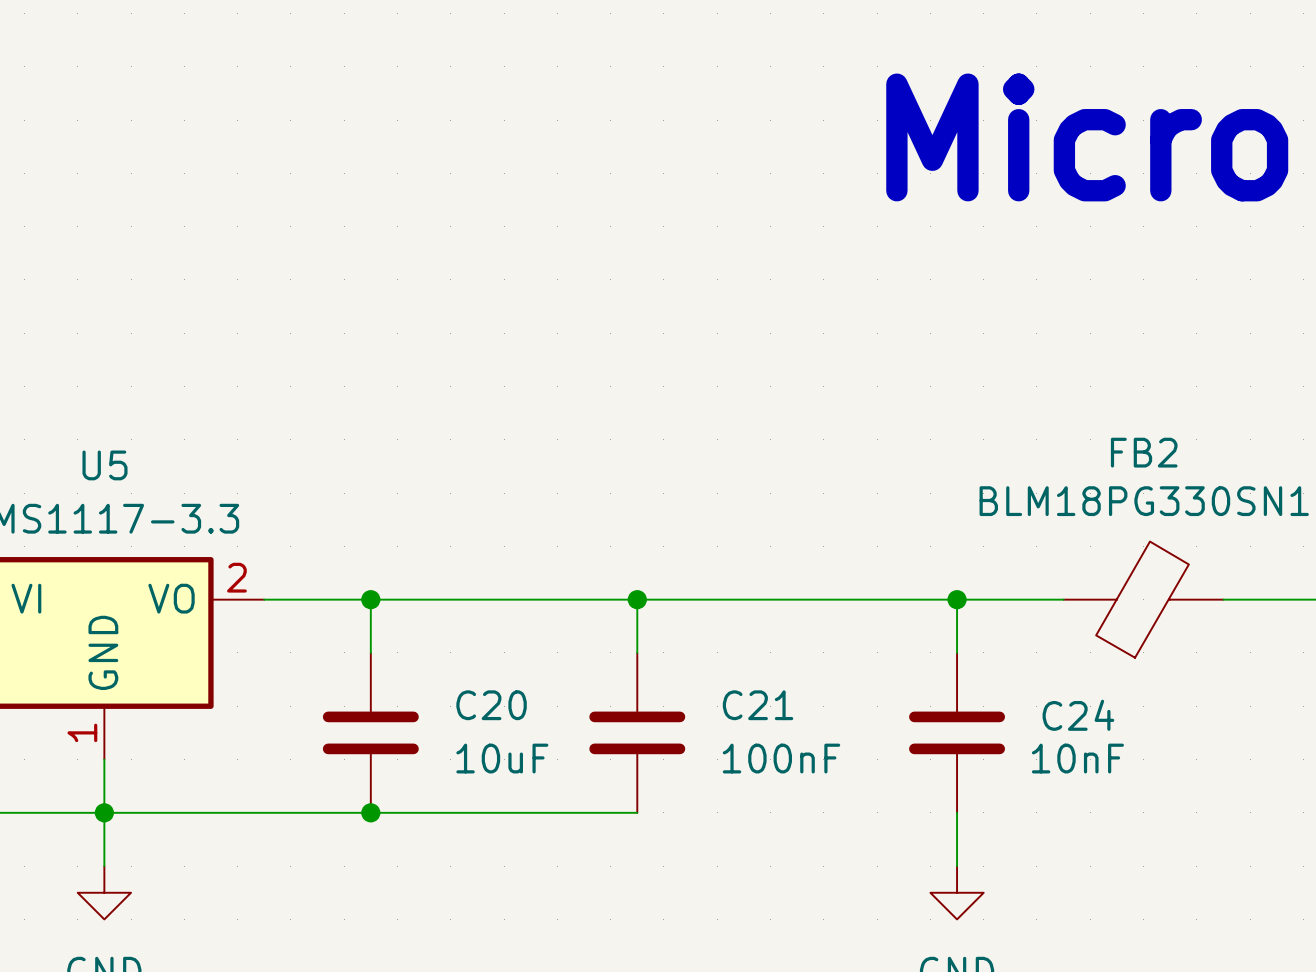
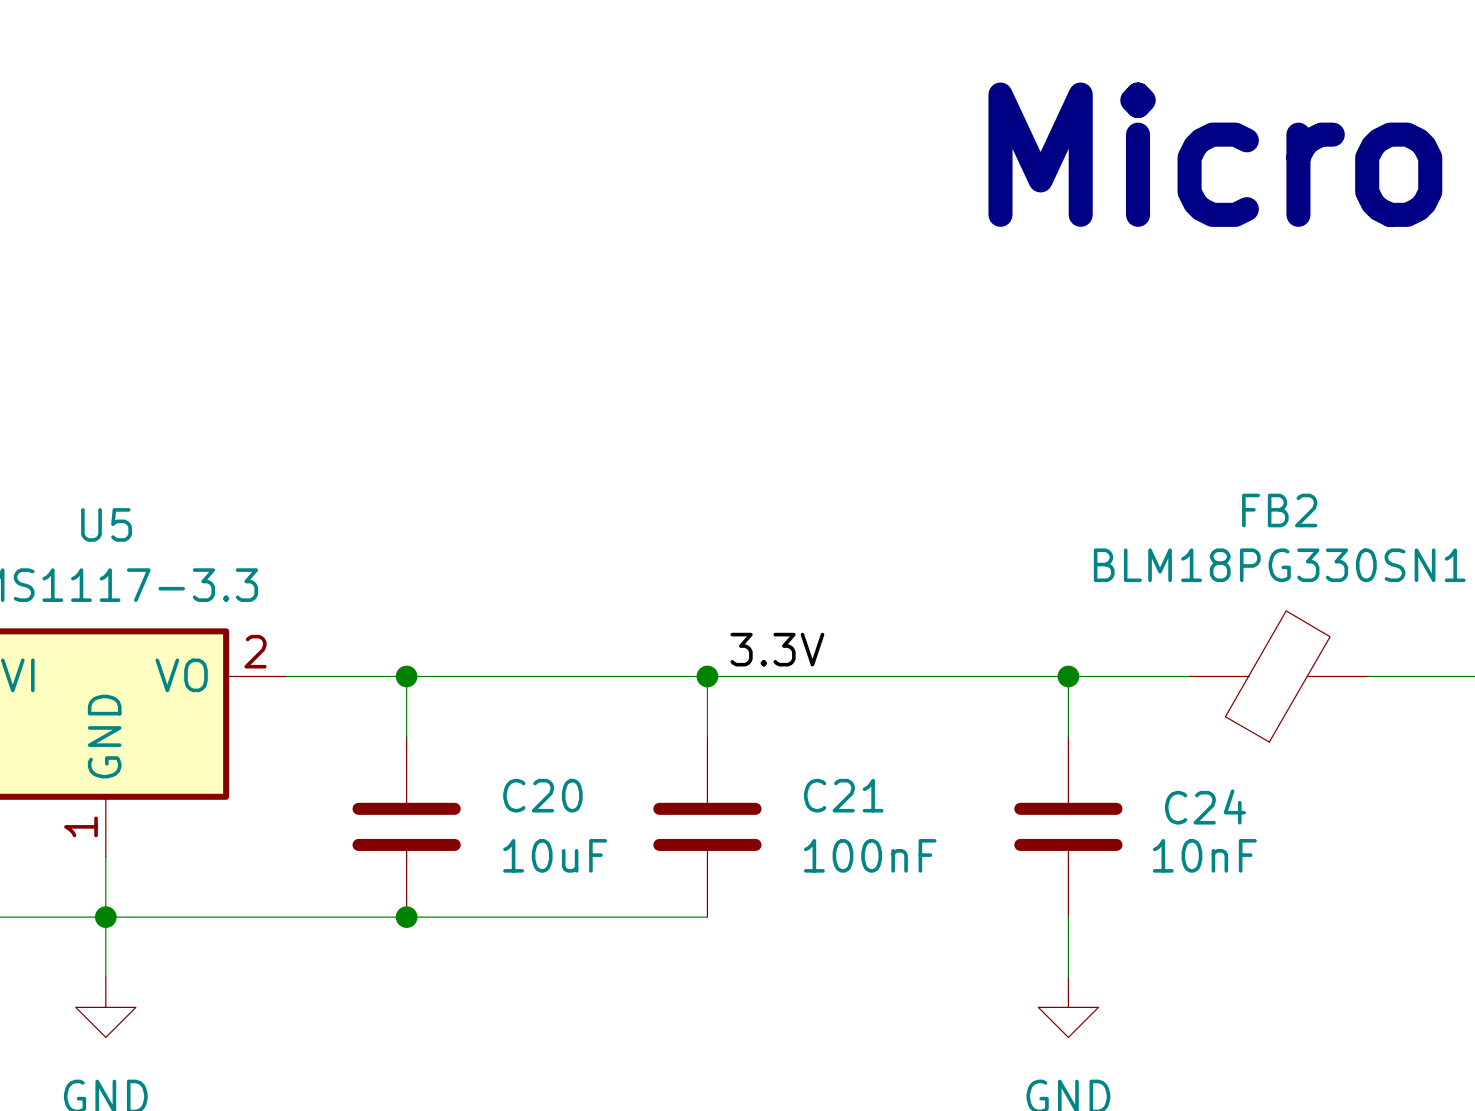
label: none -> 3.3V (777, 649)

